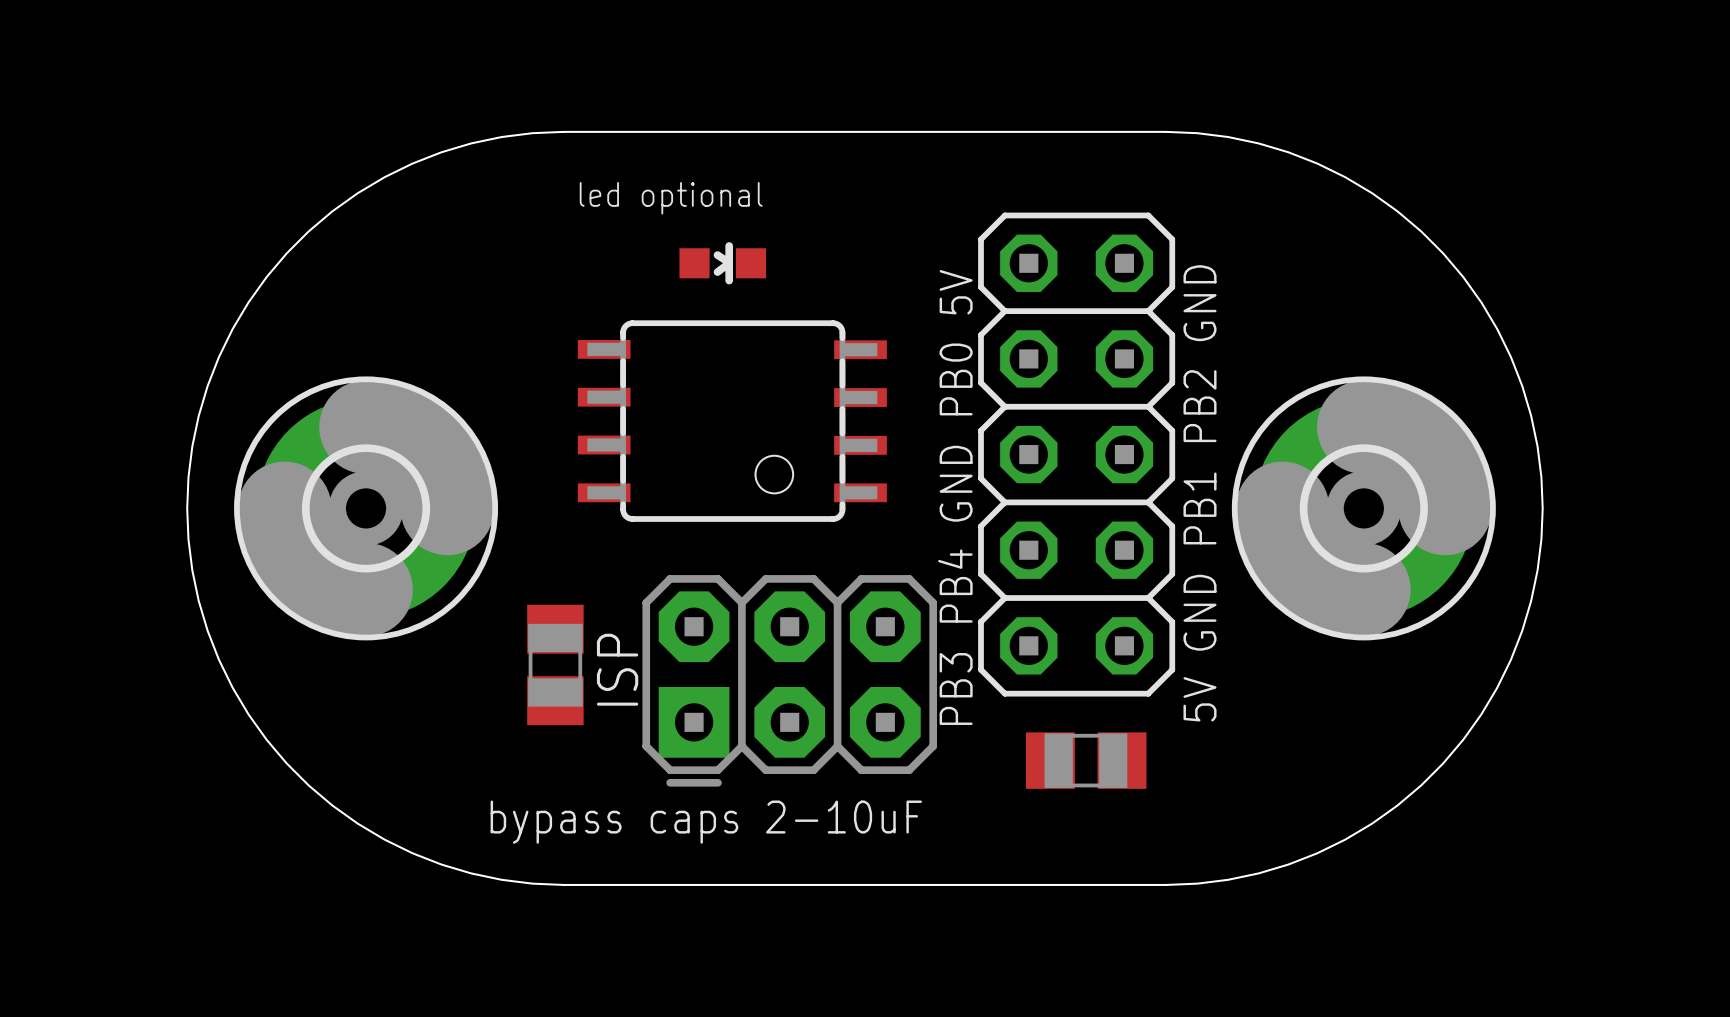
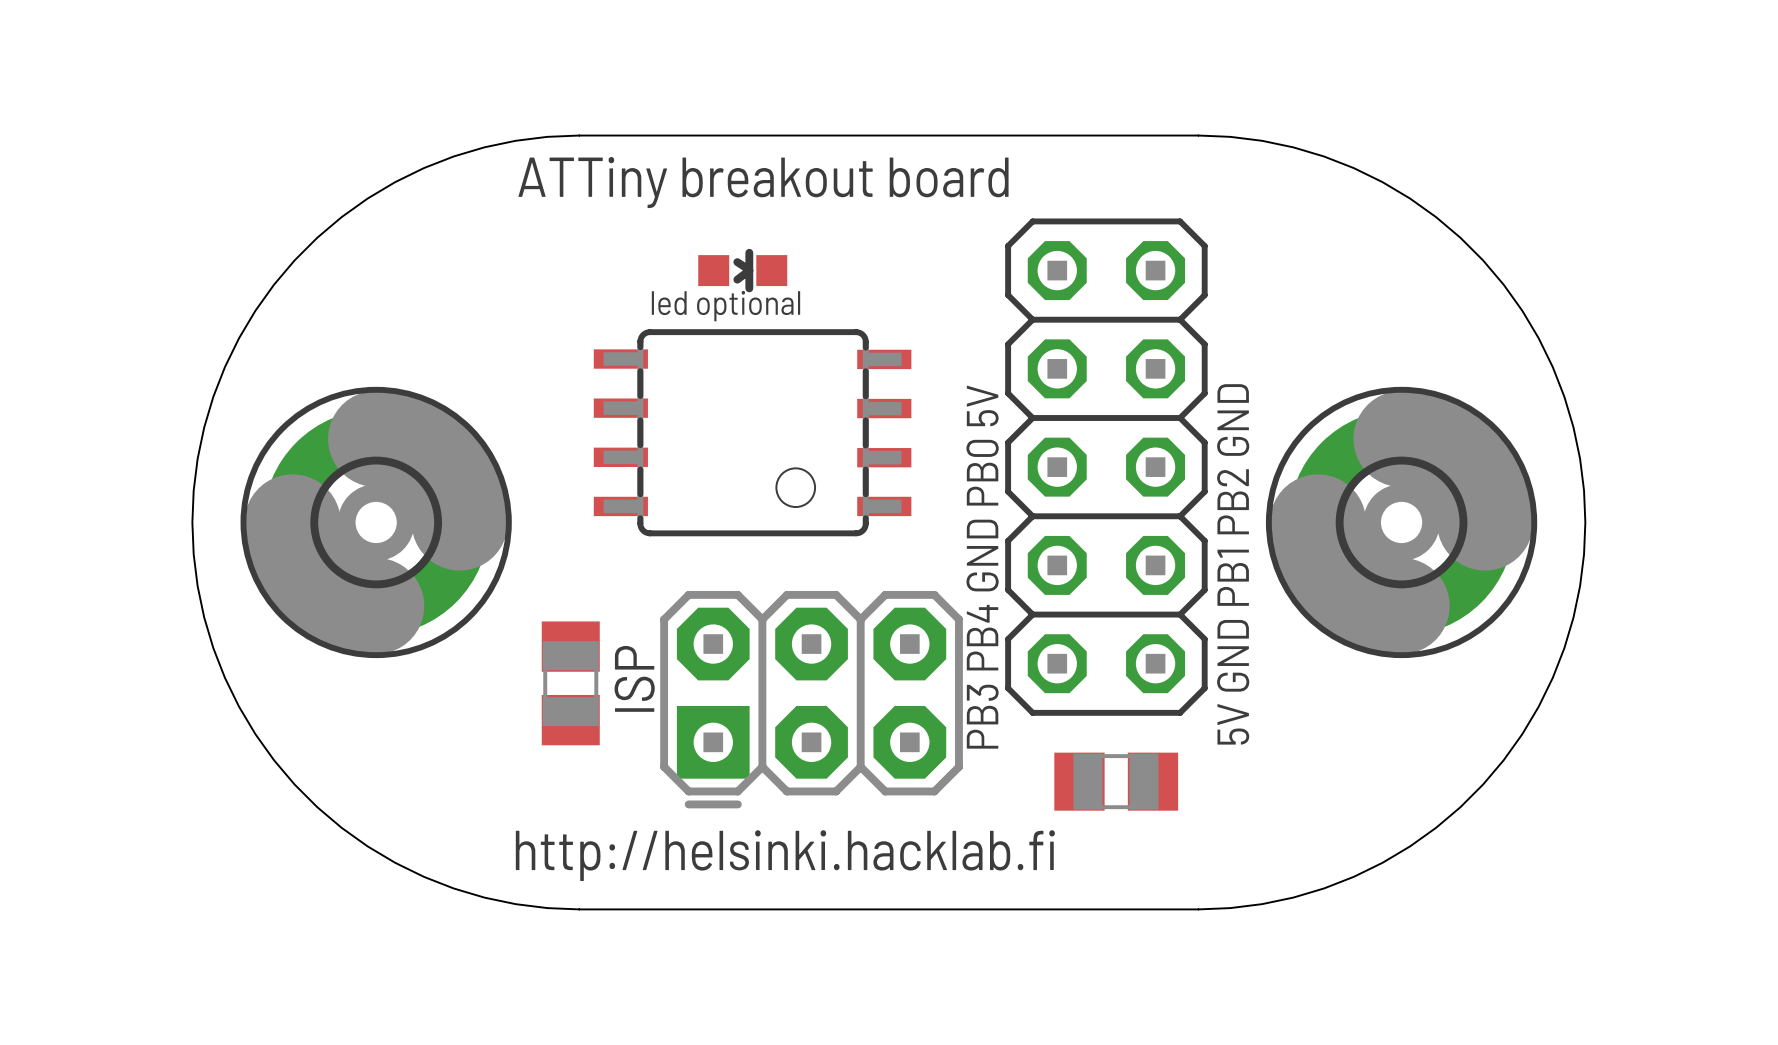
text: none -> ATTiny breakout board (763, 182)
text position: led optional (671, 198) -> led optional (725, 306)
text: bypass caps 2-10uF (706, 822) -> http://helsinki.hacklab.fi (785, 855)

